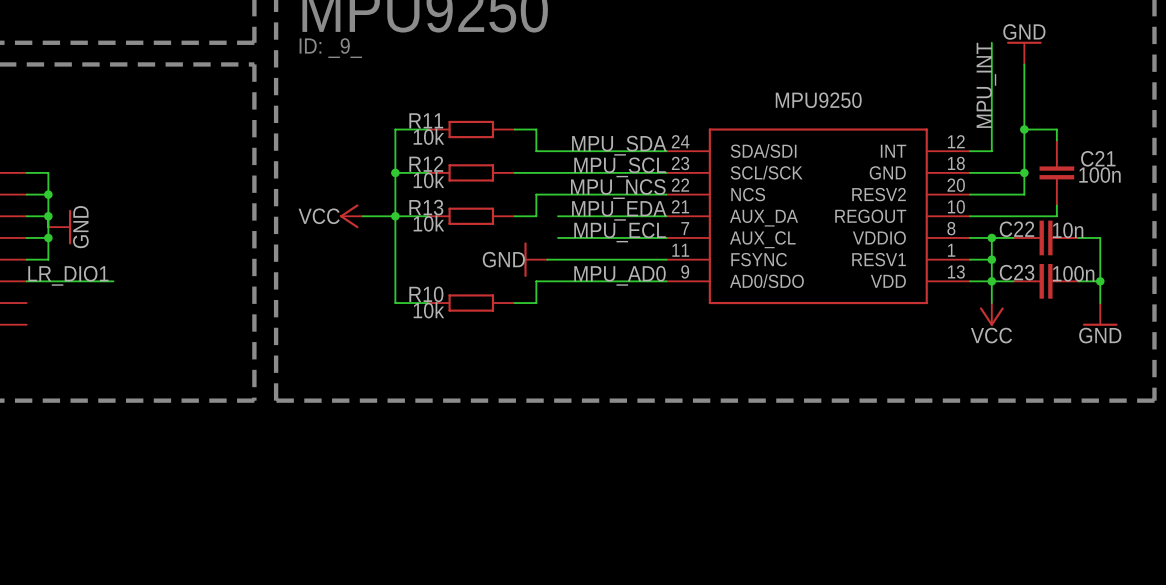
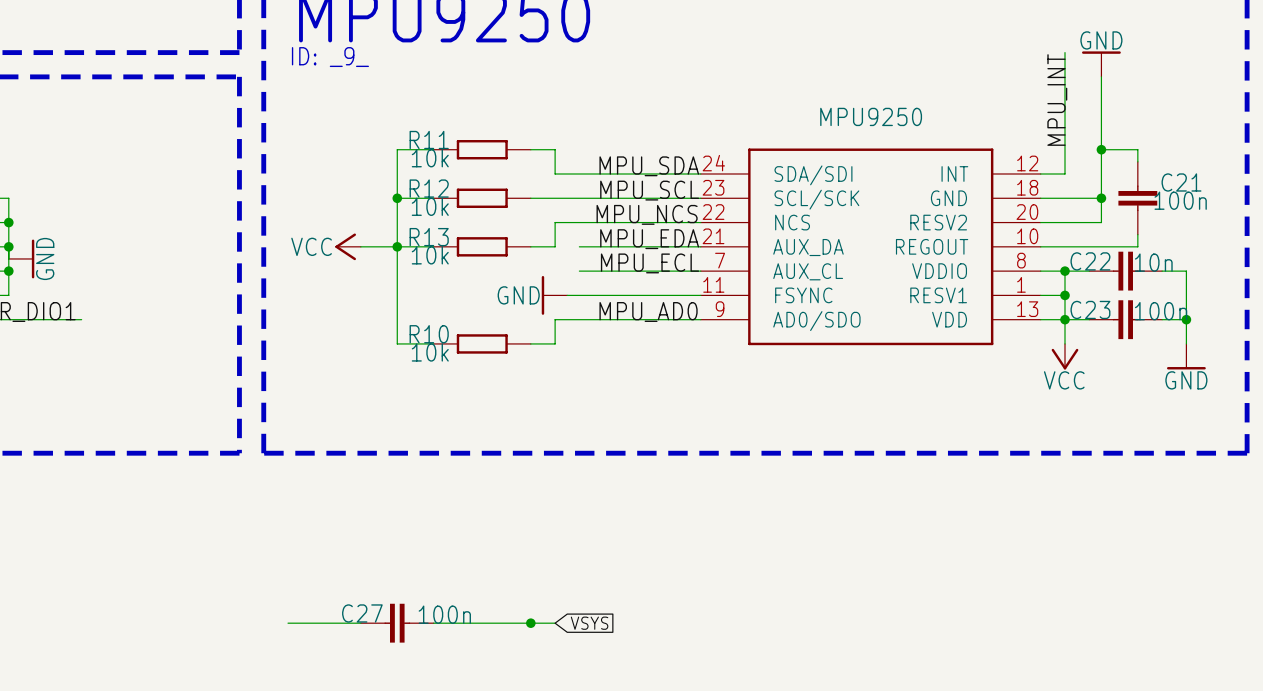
wire: none -> (288, 623) (360, 623)
C27: none -> 100n (397, 623)
wire: none -> (433, 623) (555, 623)
junction: none -> (530, 623)
global label: none -> VSYS (589, 623)

